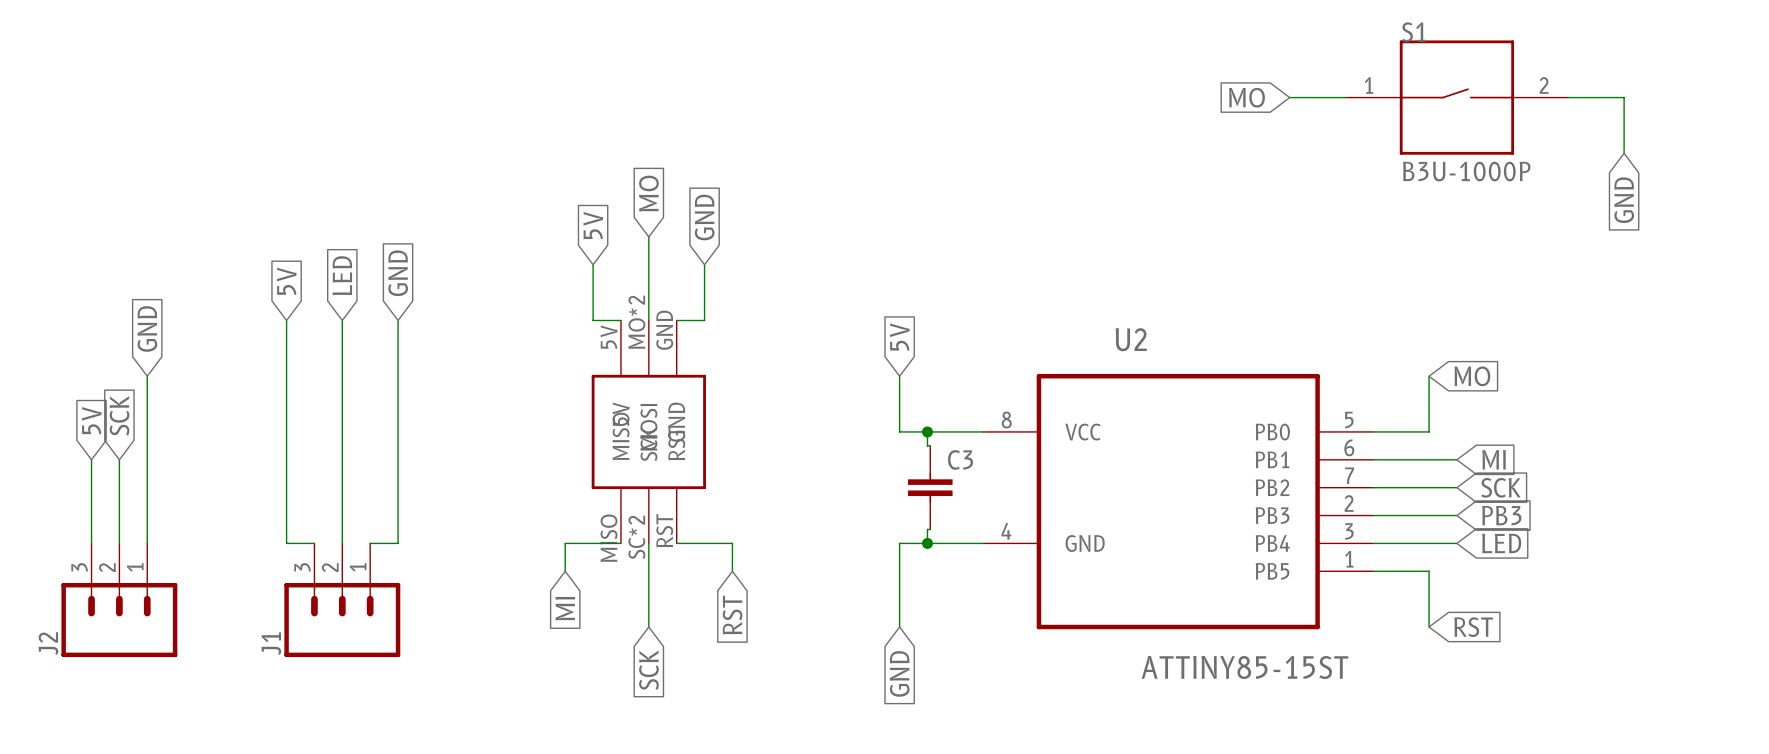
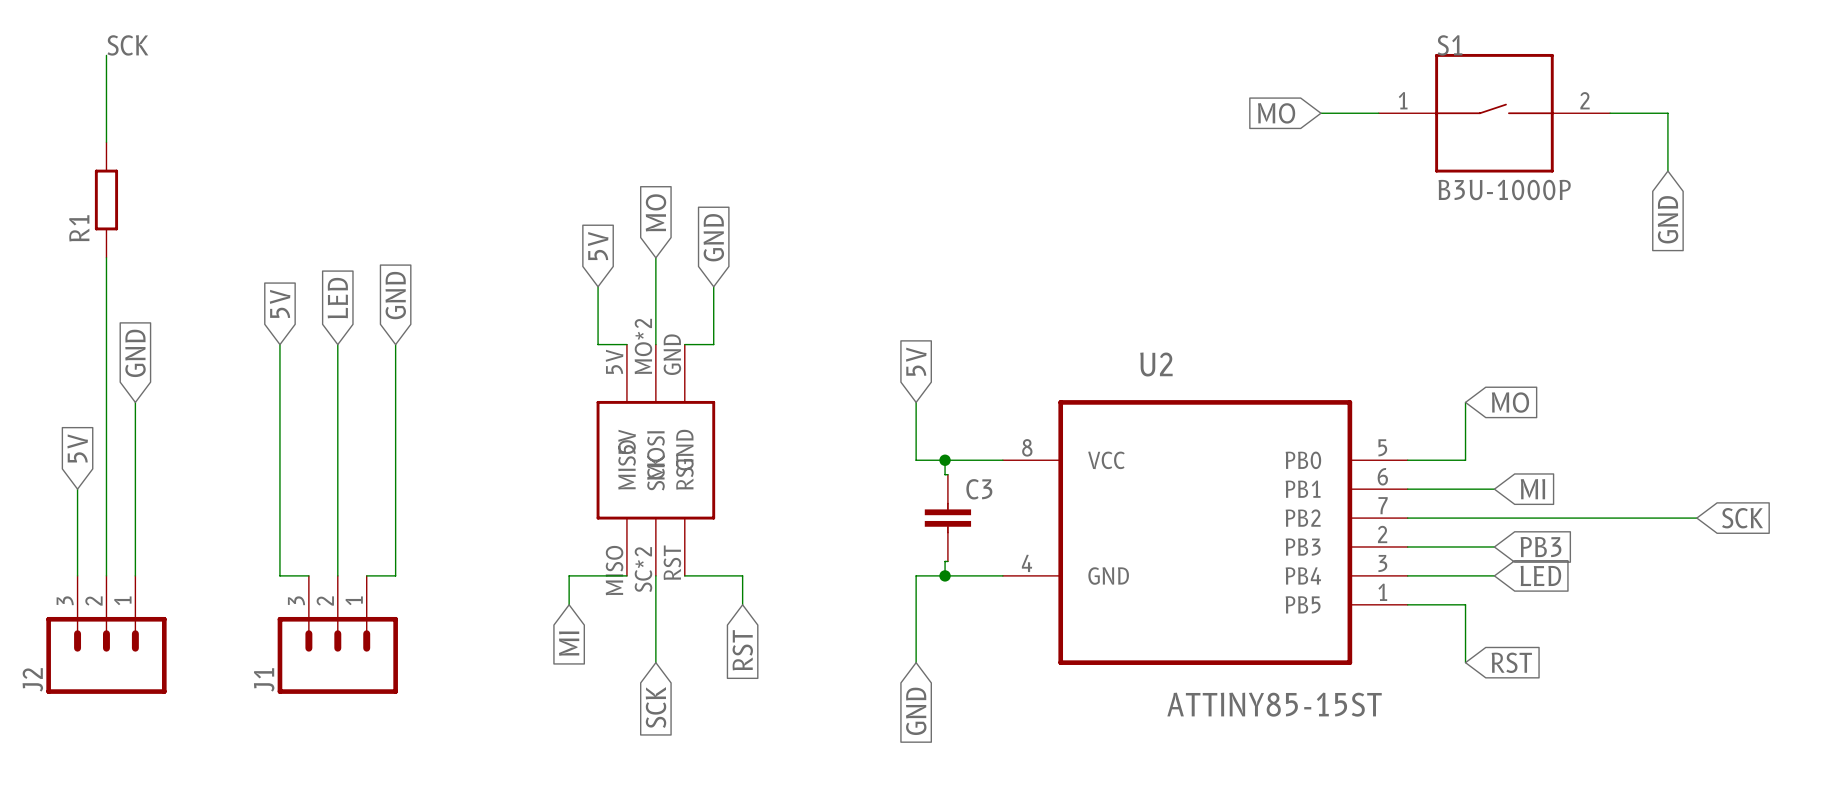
label: none -> SCK (127, 45)
wire: none -> (106, 55) (106, 142)
R1: none -> (106, 200)
wire: none -> (106, 257) (106, 489)
global label: SCK (119, 415) -> none
wire: none -> (1494, 518) (1696, 518)
global label position: SCK (1500, 487) -> SCK (1742, 518)

